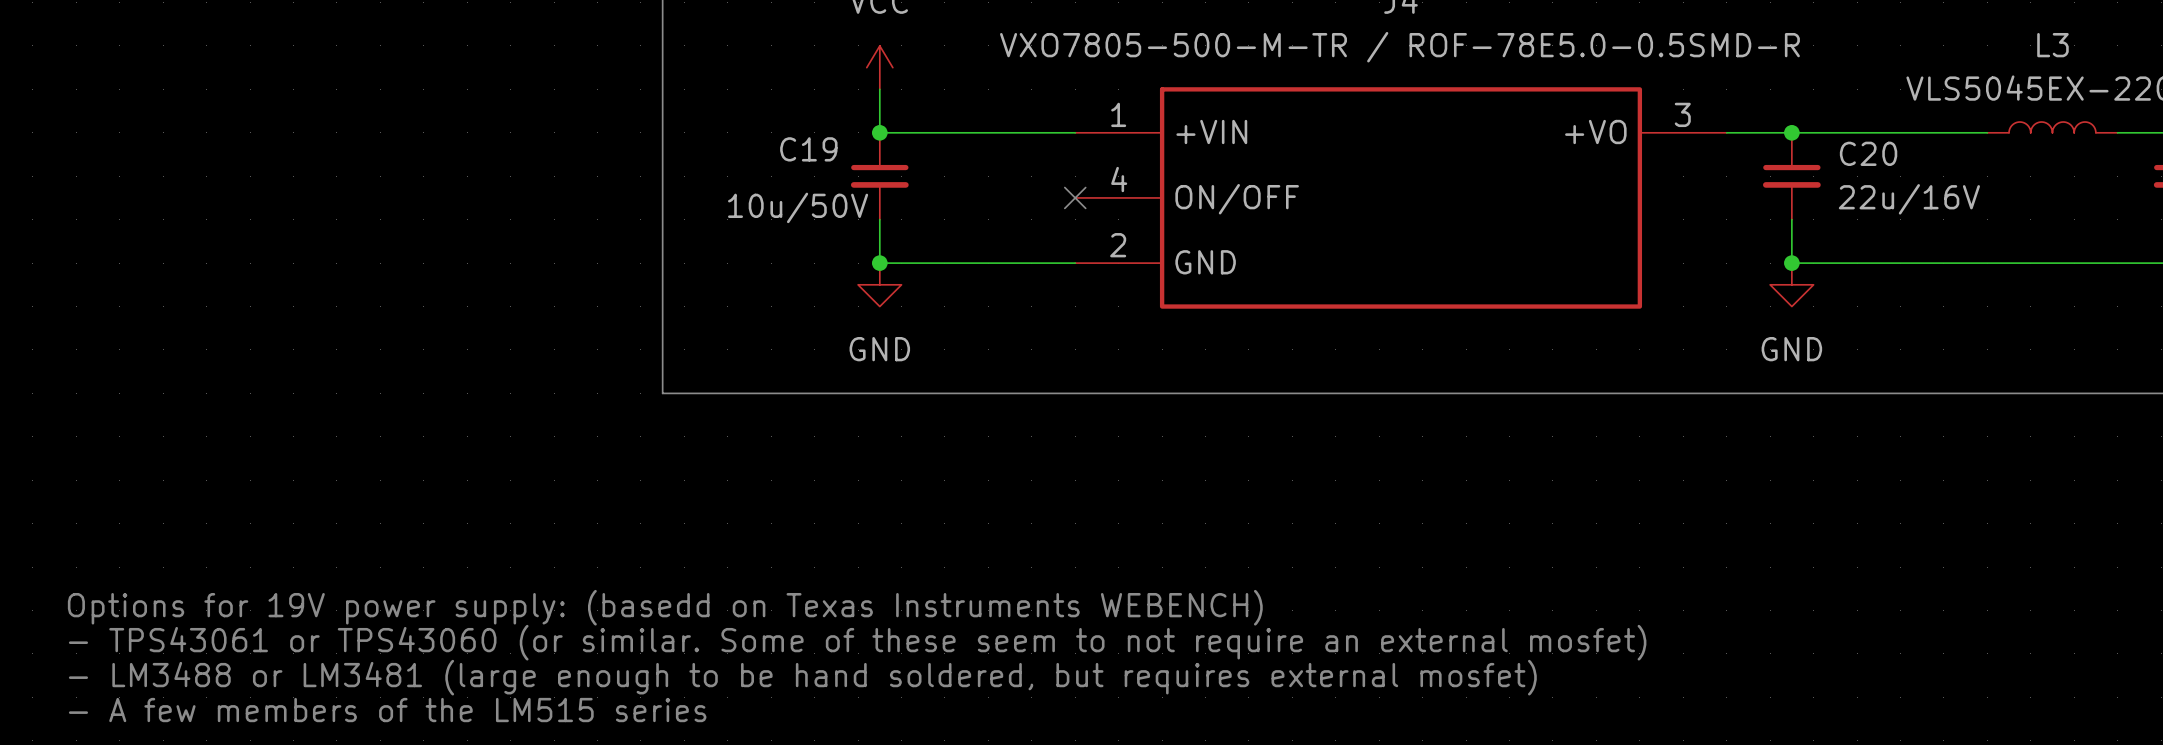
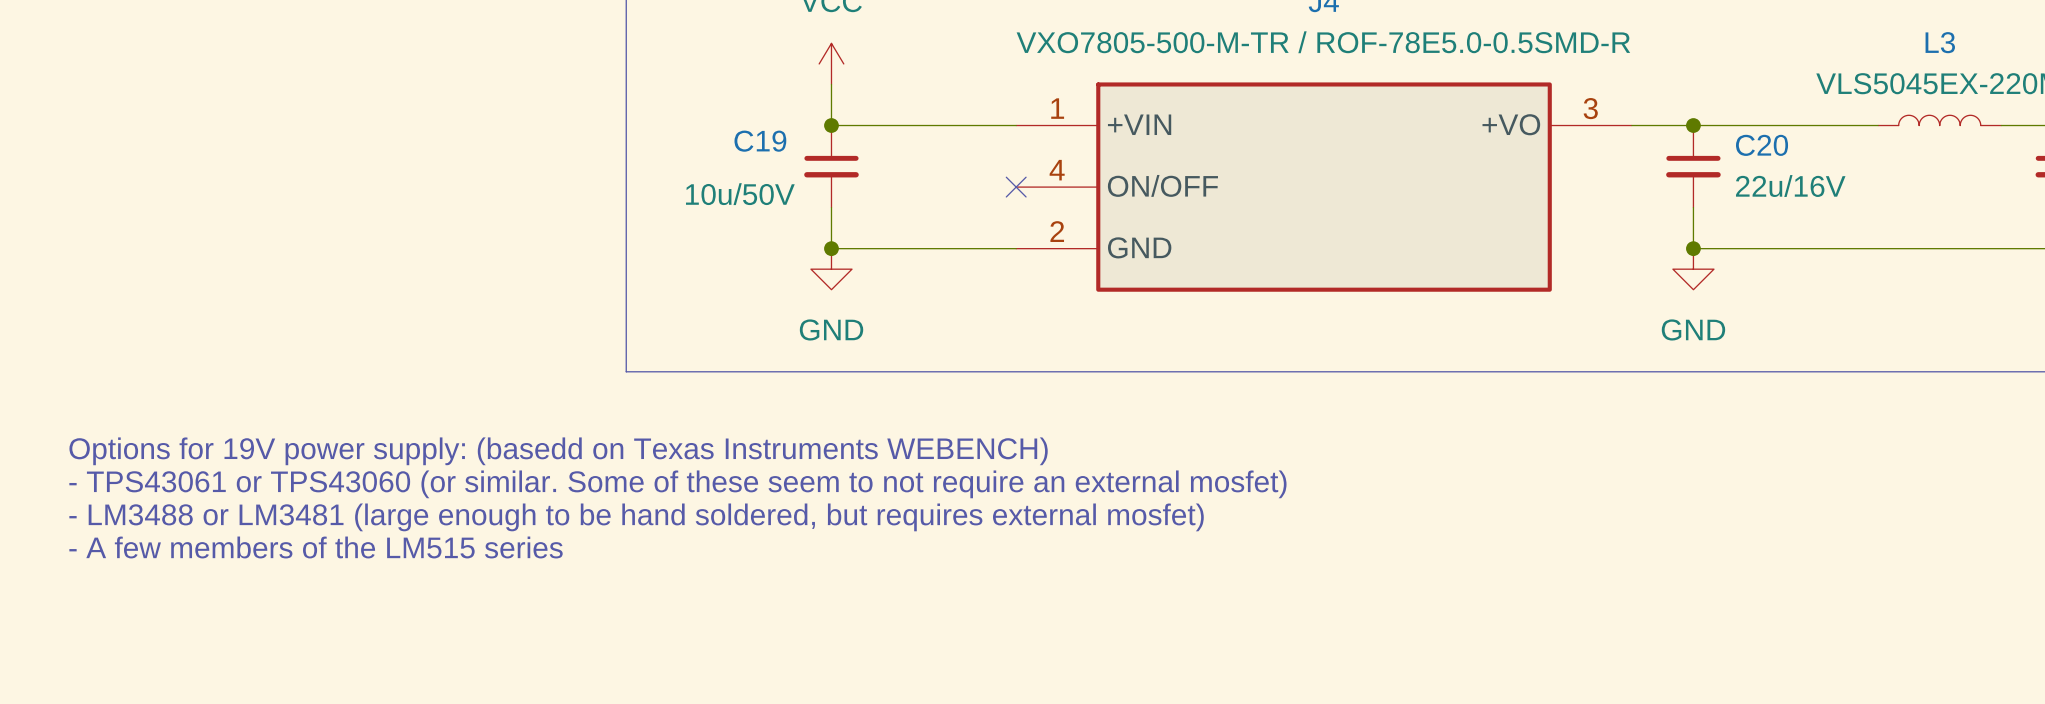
text position: Options for 19V power supply: (basedd on Texas Instruments WEBENCH) (665, 607) -> Options for 19V power supply: (basedd on Texas Instruments WEBENCH) (558, 451)
text position: - TPS43061 or TPS43060 (or similar. Some of these seem to not require an external mosfet) (857, 642) -> - TPS43061 or TPS43060 (or similar. Some of these seem to not require an external mosfet) (677, 484)
text position: - LM3488 or LM3481 (large enough to be hand soldered, but requires external mosfet) (802, 677) -> - LM3488 or LM3481 (large enough to be hand soldered, but requires external mosfet) (636, 517)
text position: - A few members of the LM515 series (387, 710) -> - A few members of the LM515 series (316, 547)

